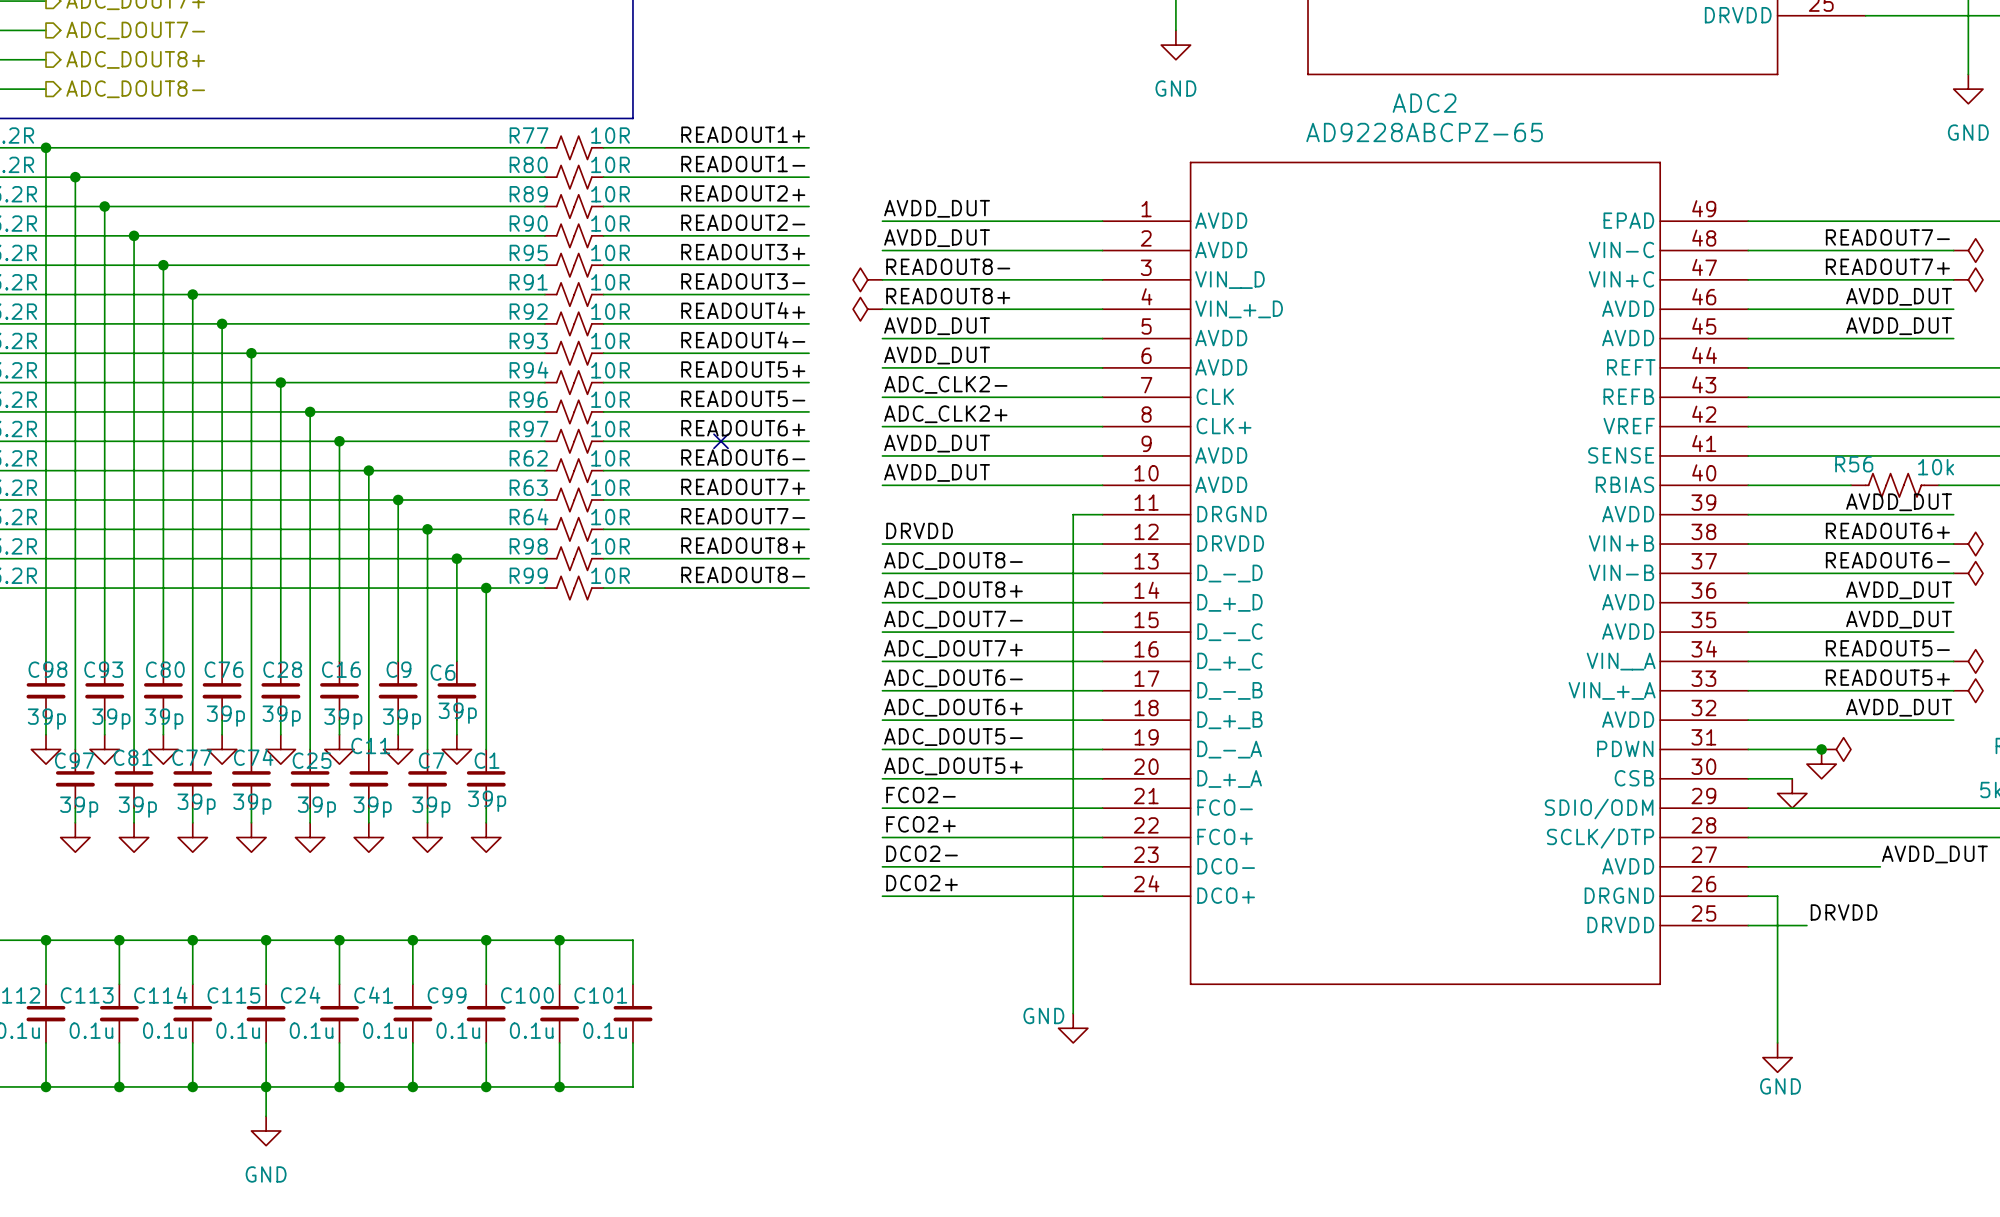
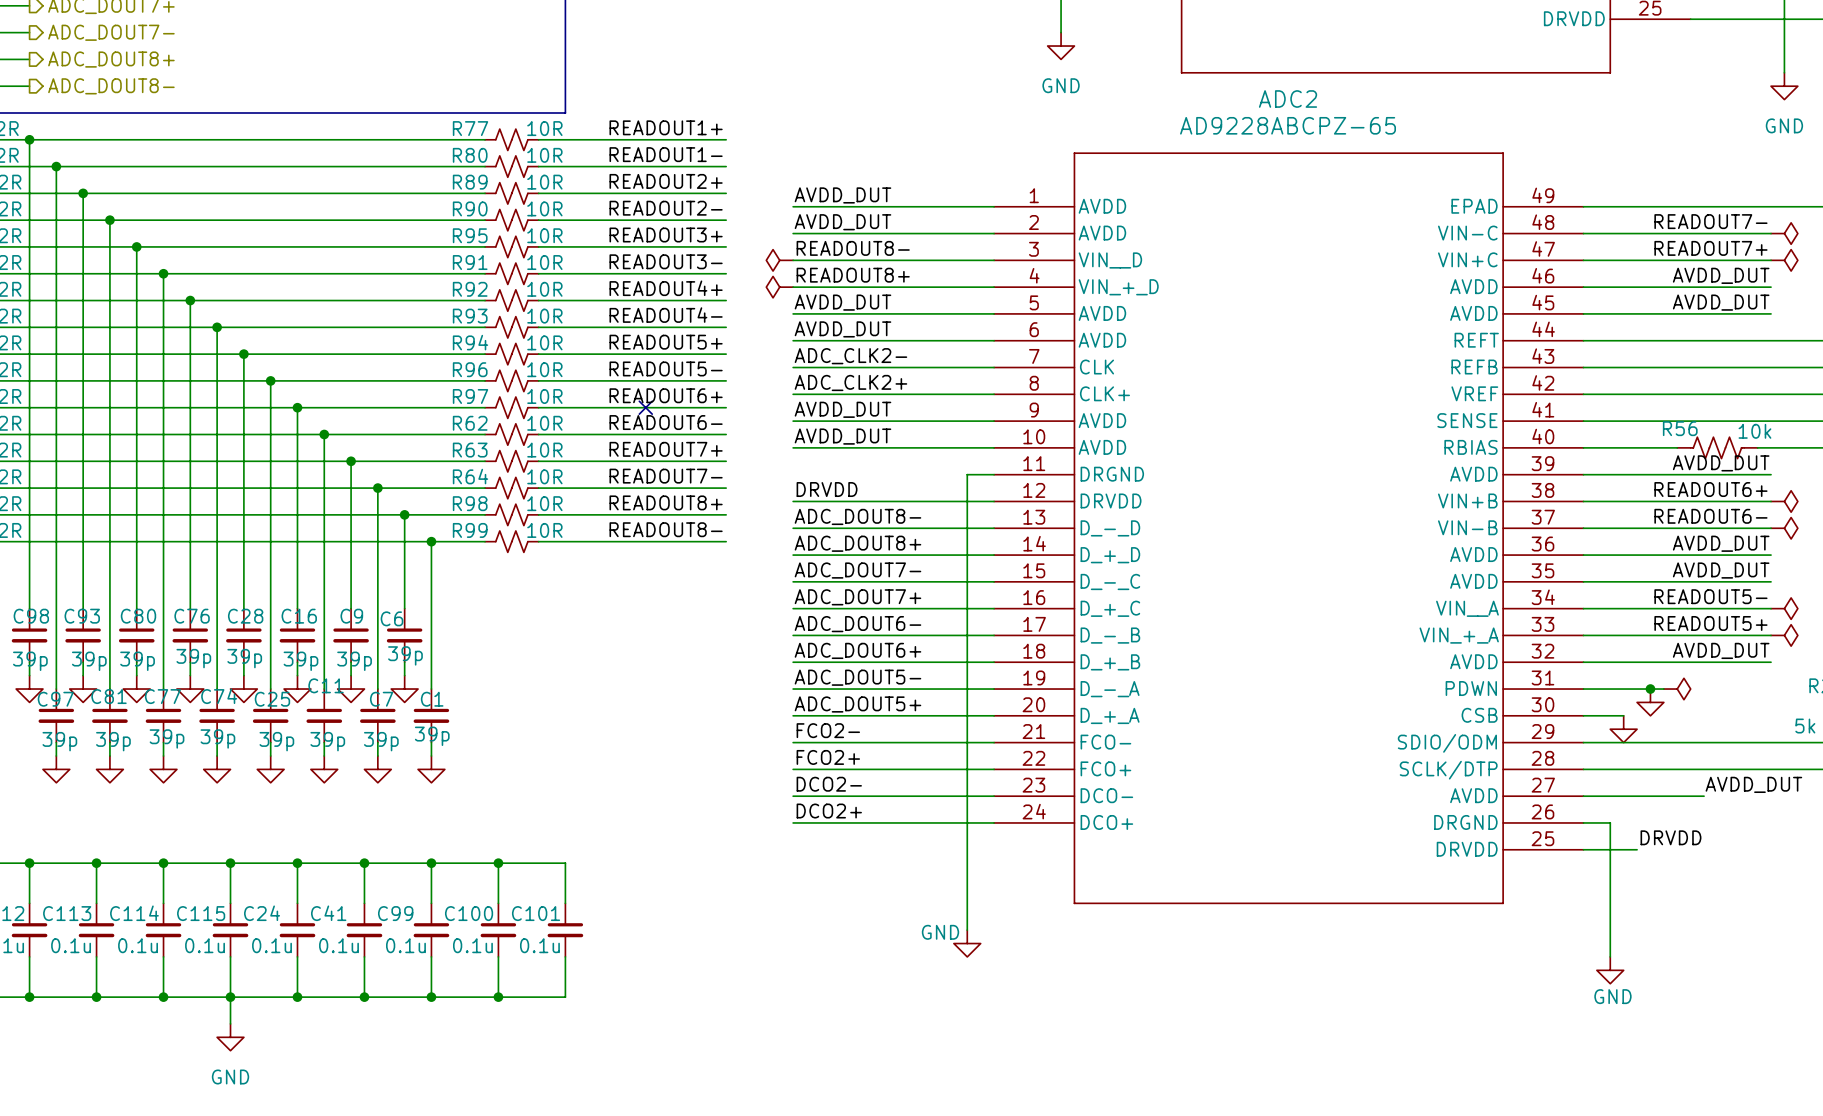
power symbol position: (1836, 749) -> (1677, 689)

